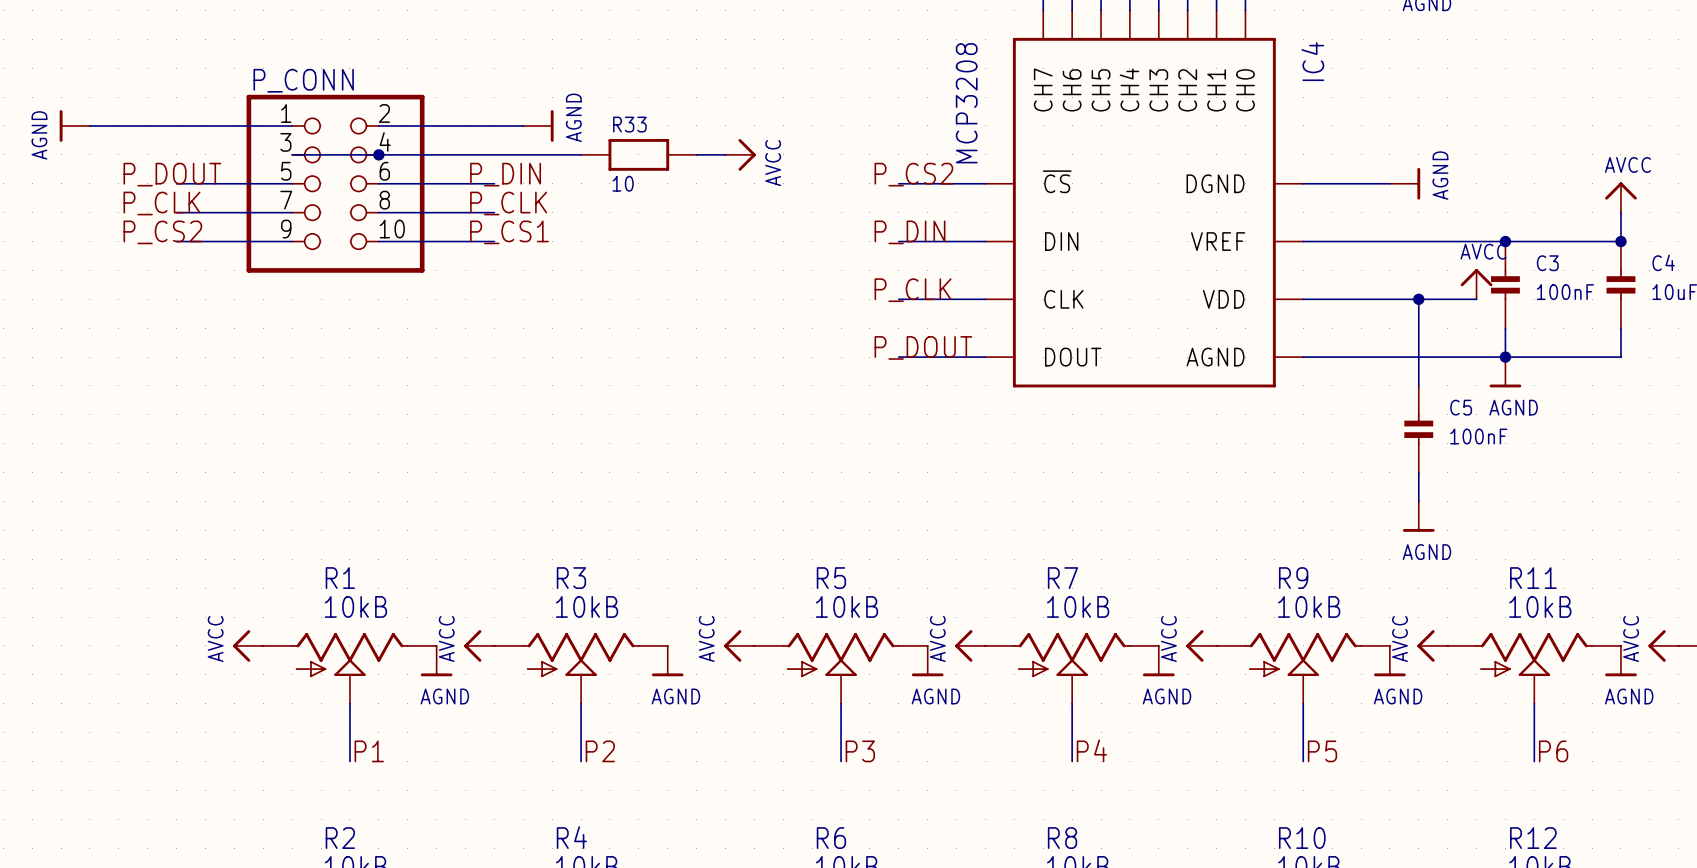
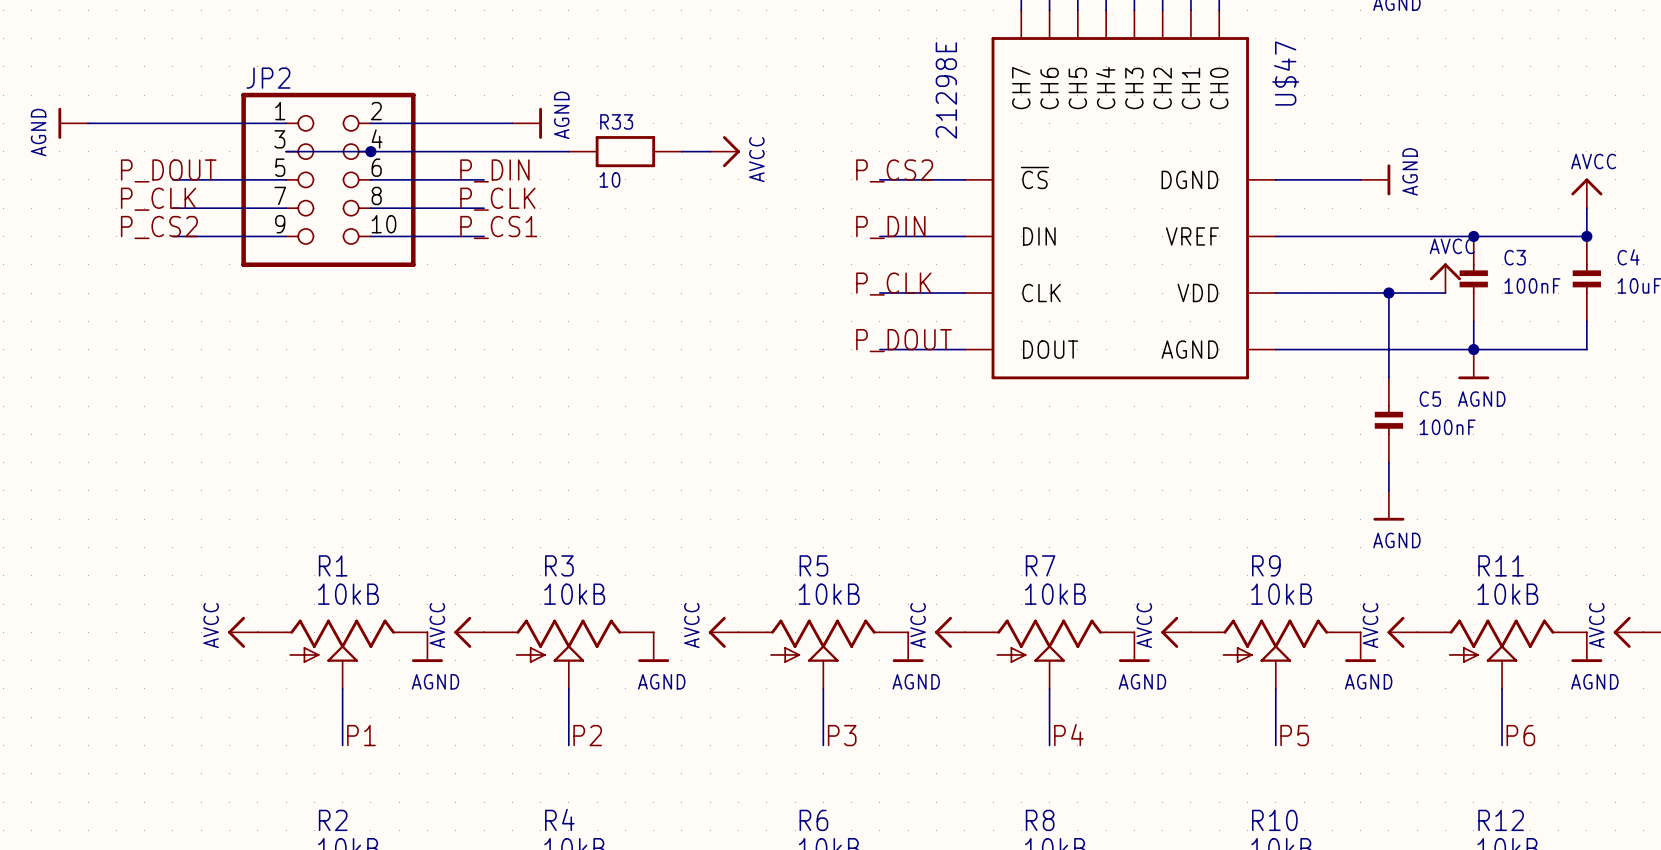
IC4 name: IC4 (1312, 61) -> U$47 (1285, 73)
P_CONN name: P_CONN (303, 80) -> JP2 (268, 78)
IC4 value: MCP3208 (966, 103) -> 21298E (946, 90)

